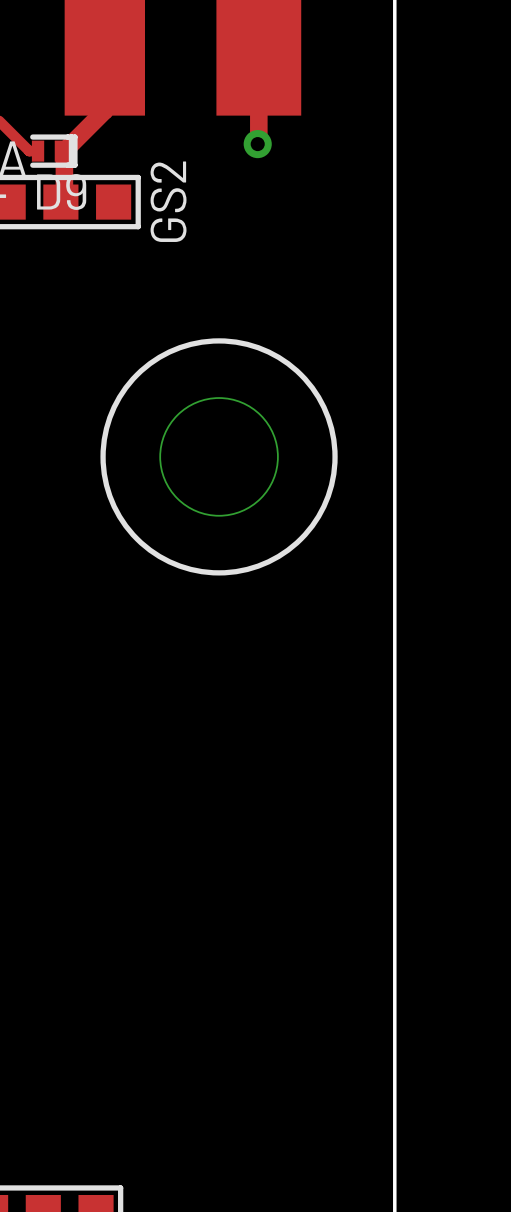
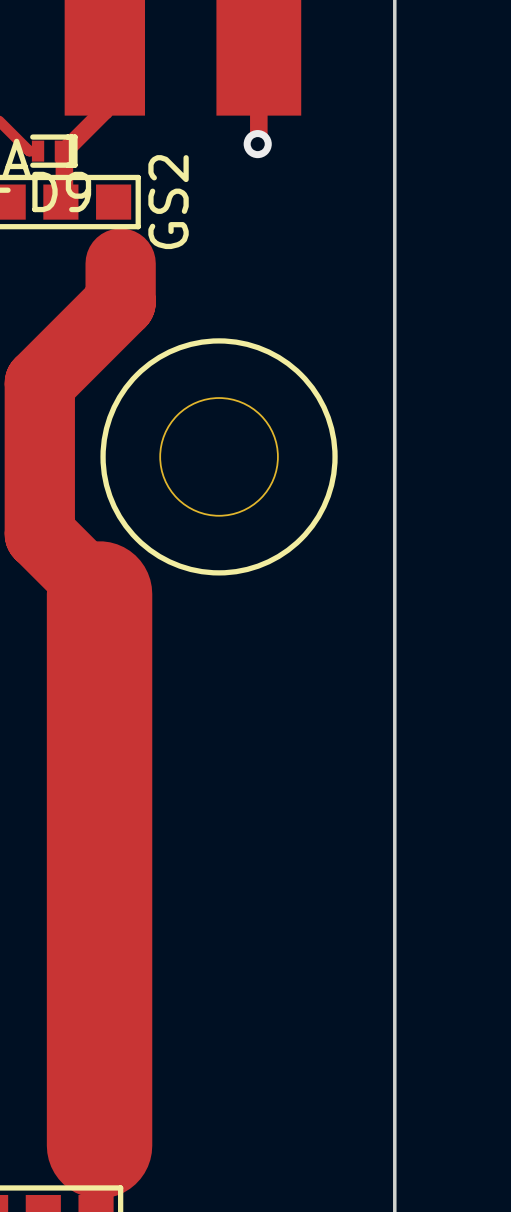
track: none -> (120, 263) (120, 302) (39, 383) (39, 534) (99, 593)
track: none -> (99, 593) (99, 1145) (99, 1142)

